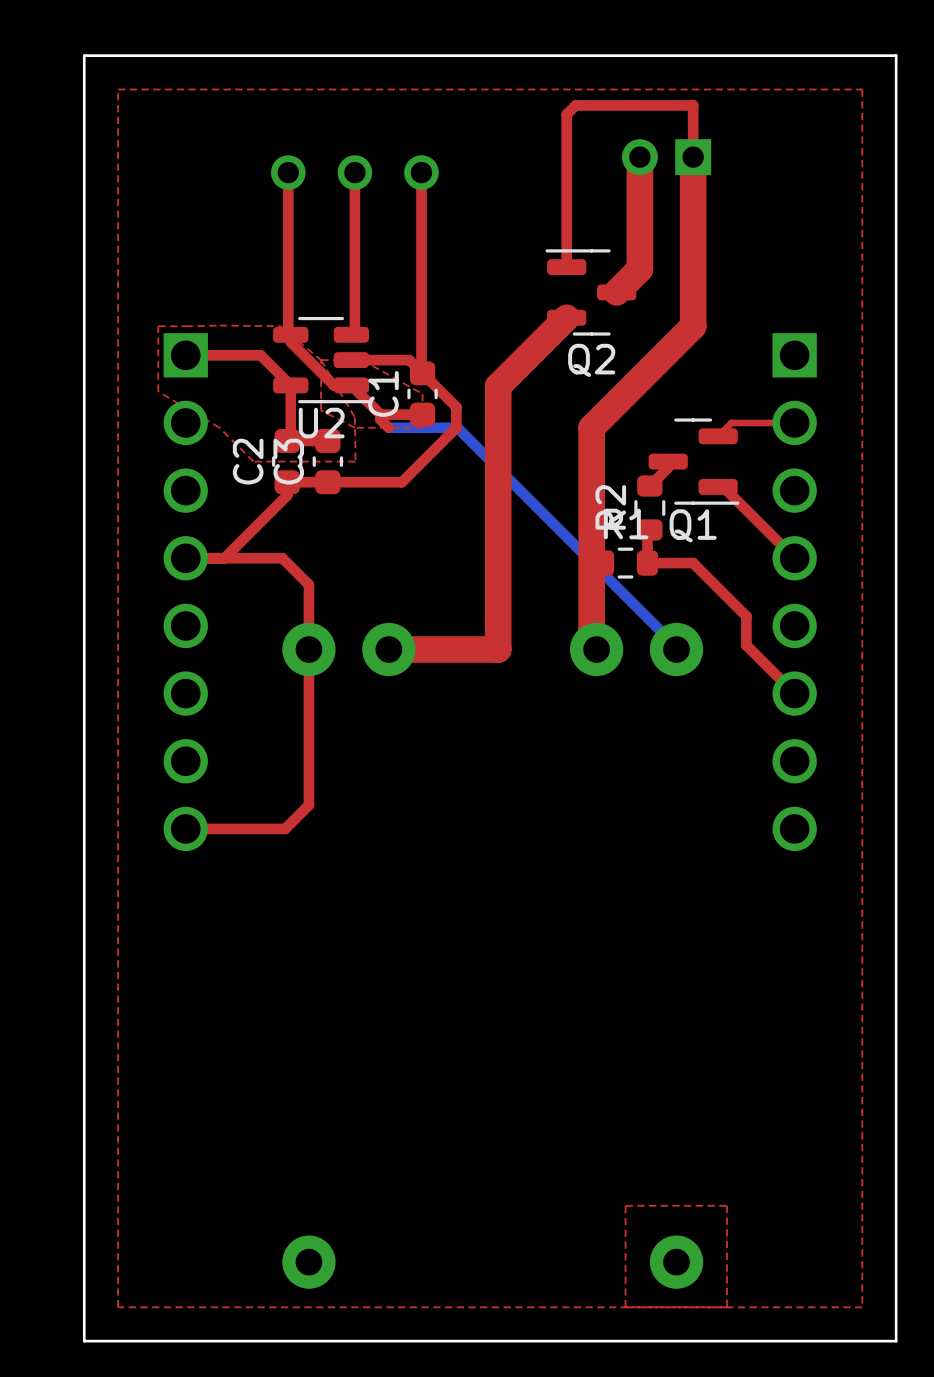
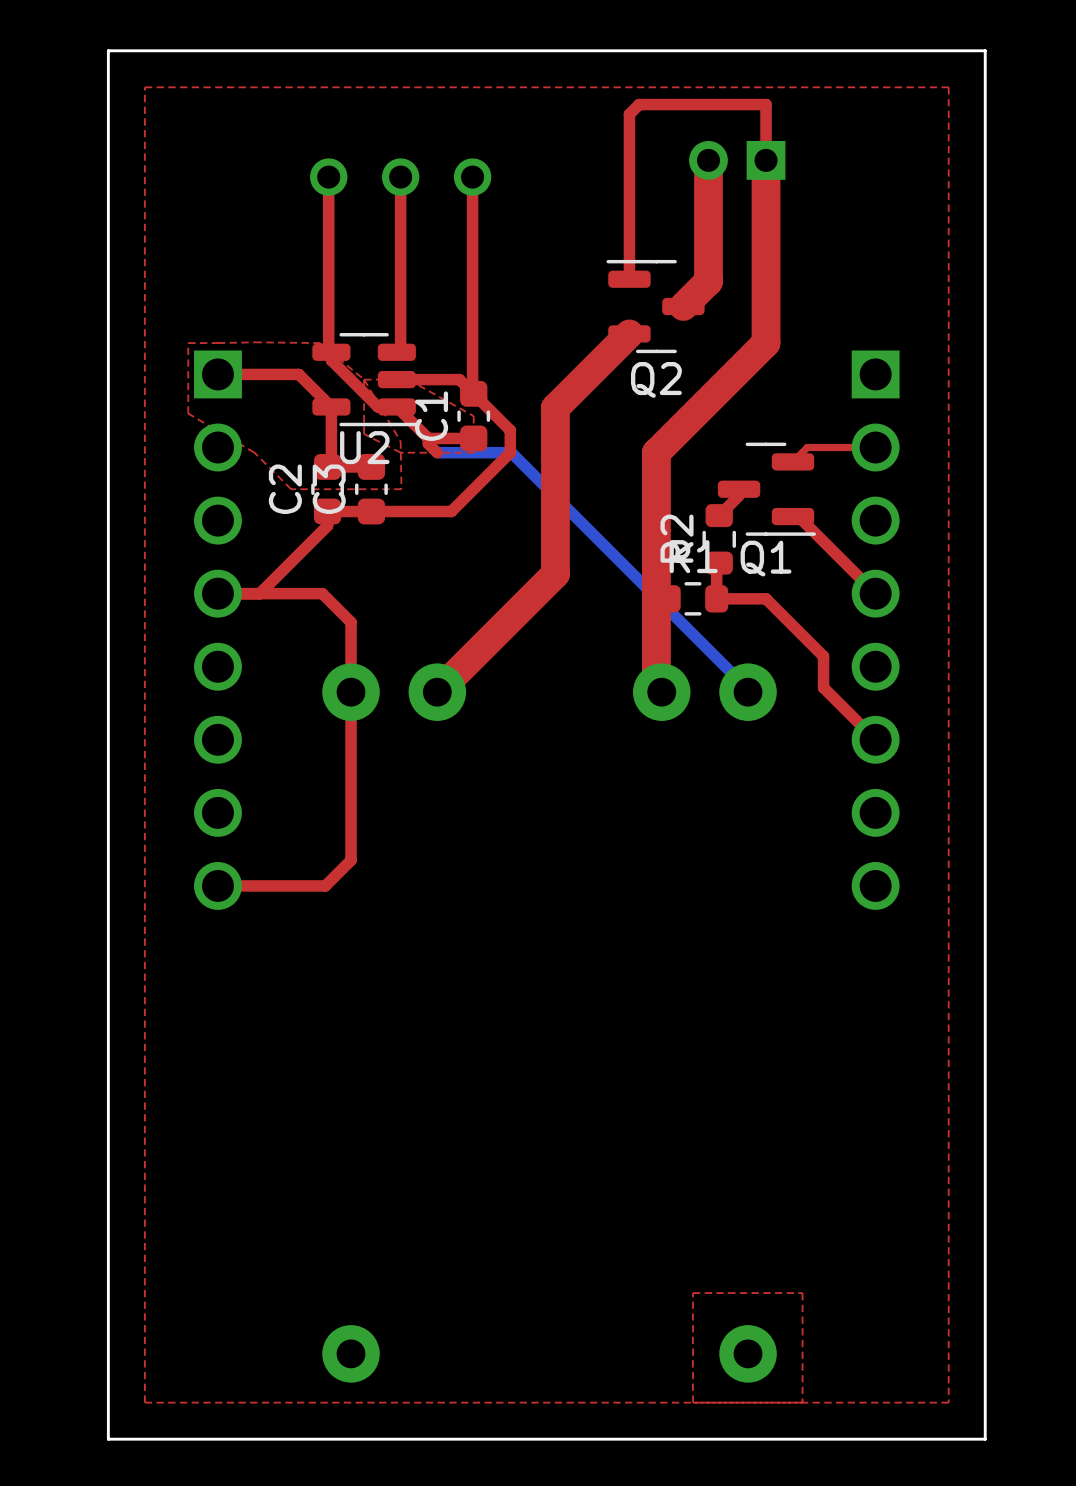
top track: (498, 540) (498, 649) (388, 649) -> (555, 574) (437, 692)

